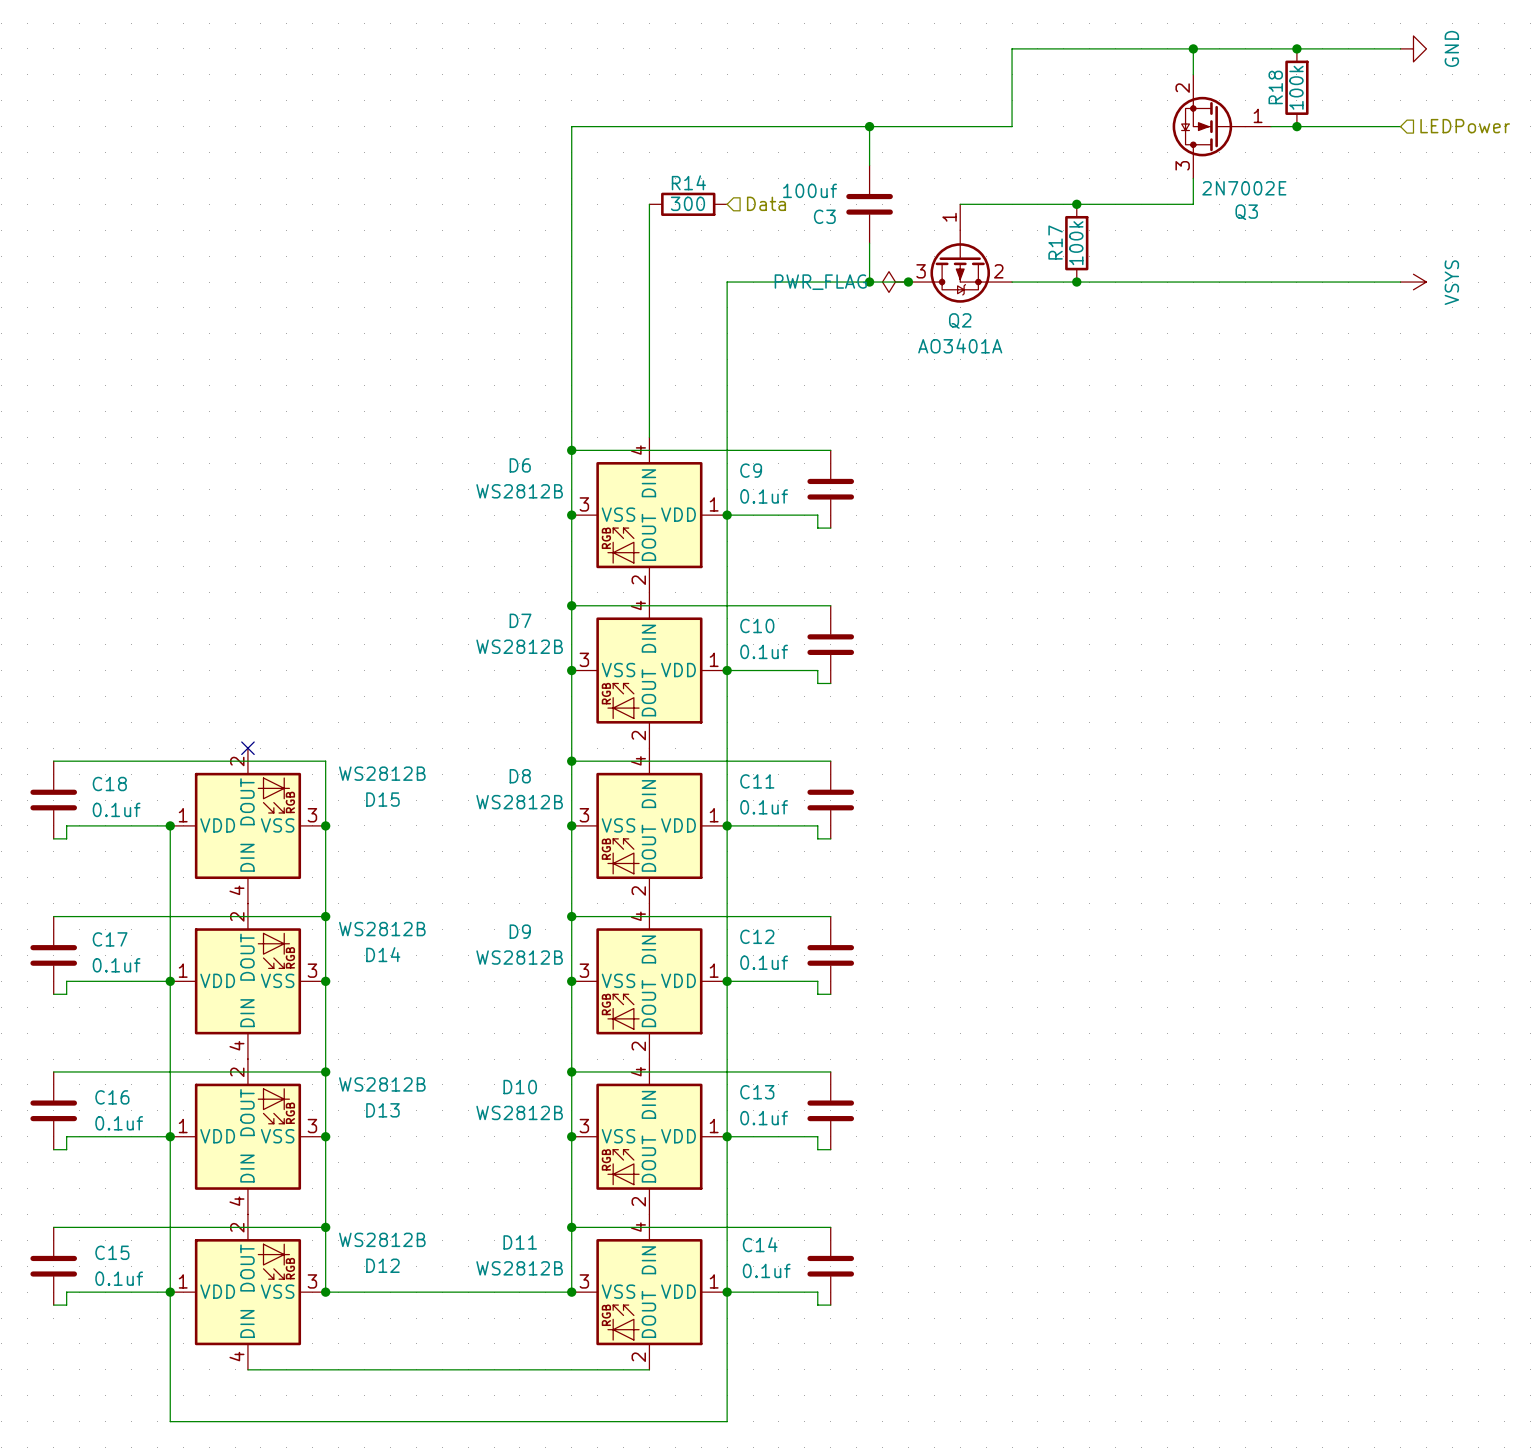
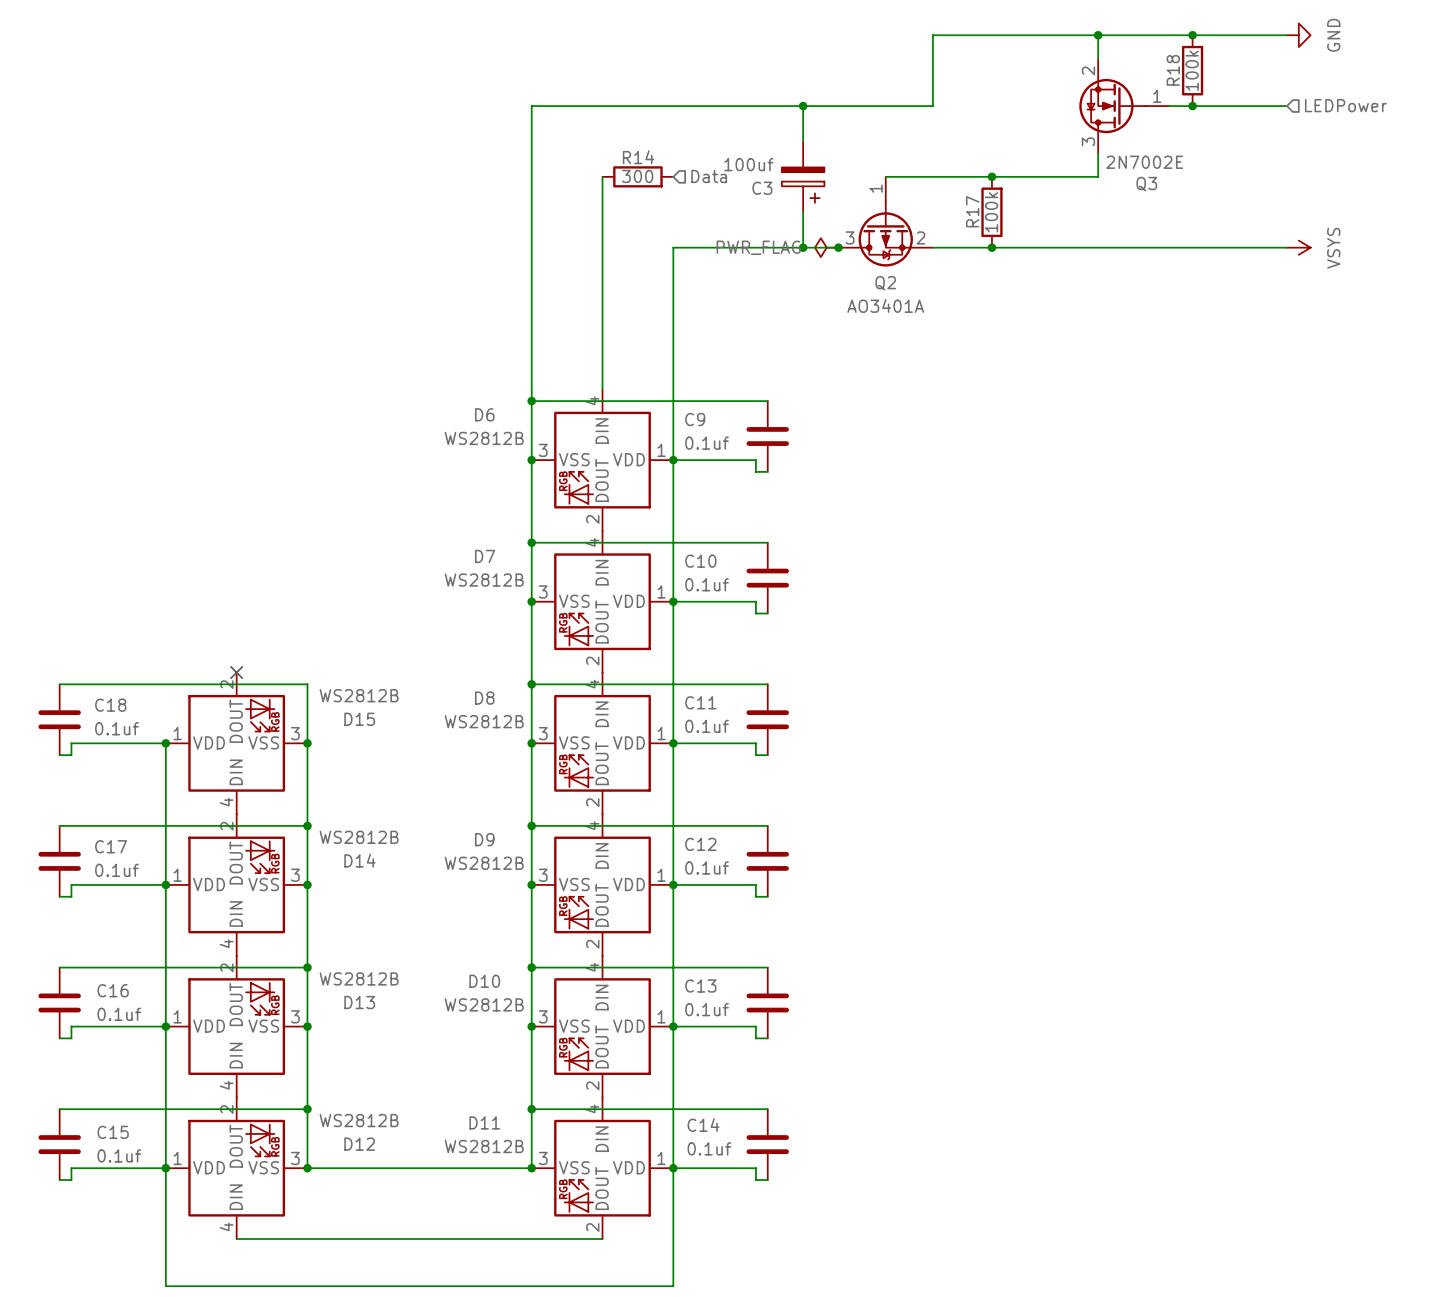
C3 symbol: [846, 165, 893, 244] -> [781, 141, 825, 213]

